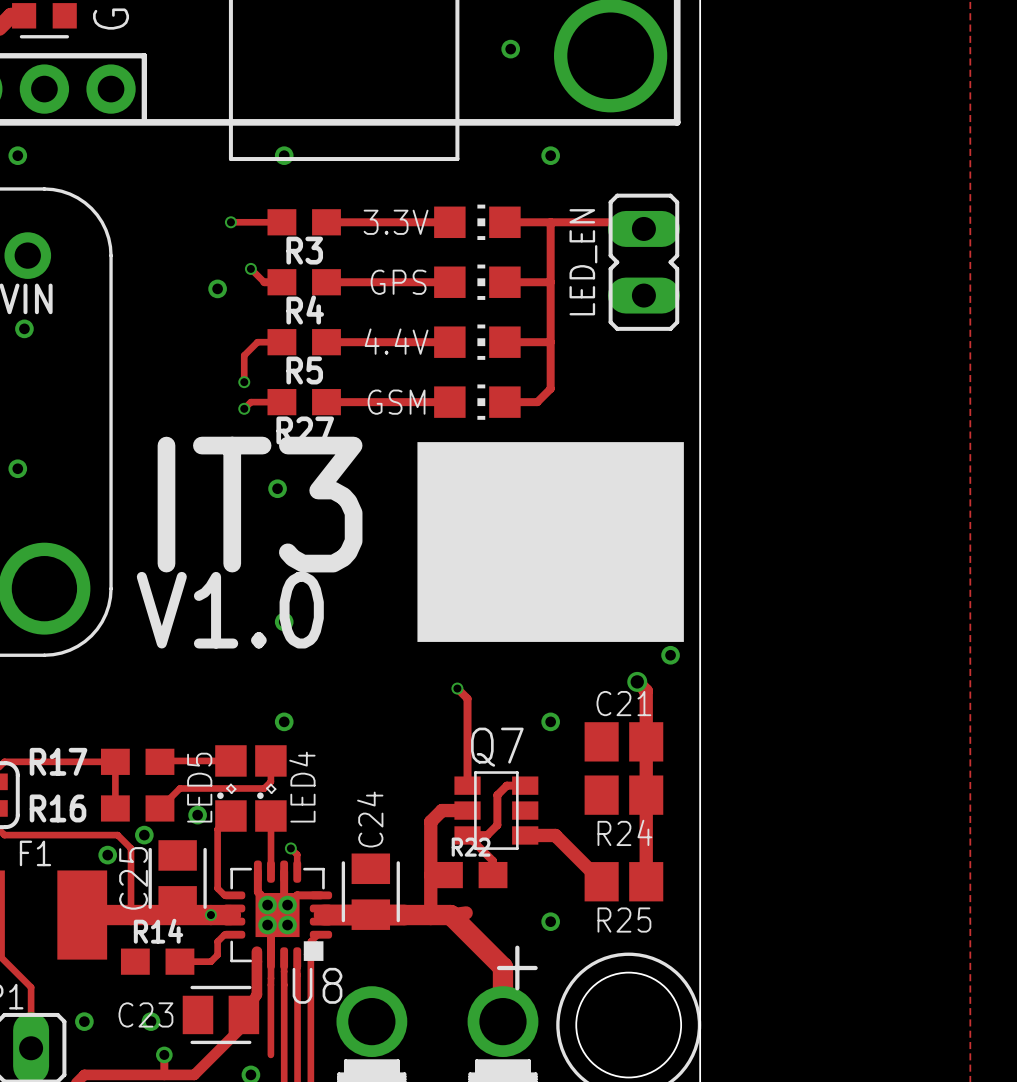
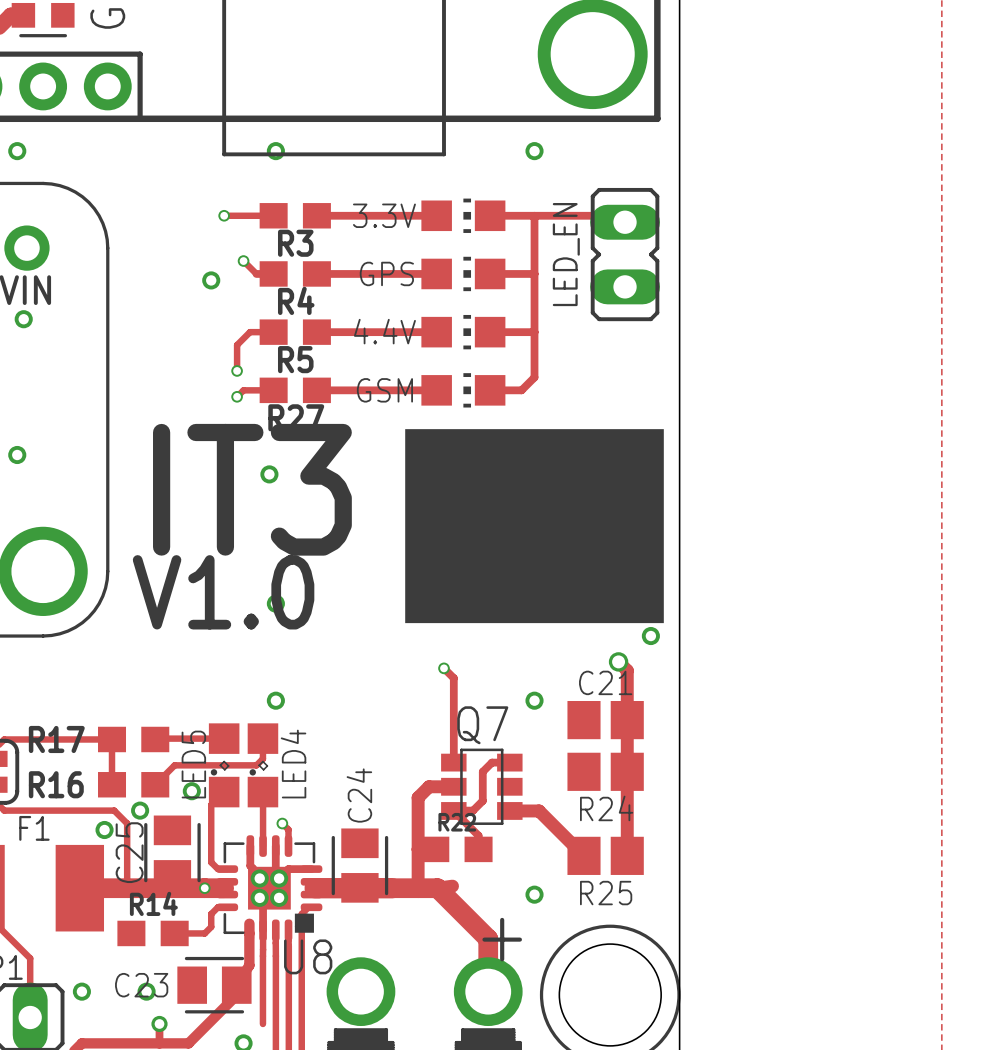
via: (510, 49) -> none

